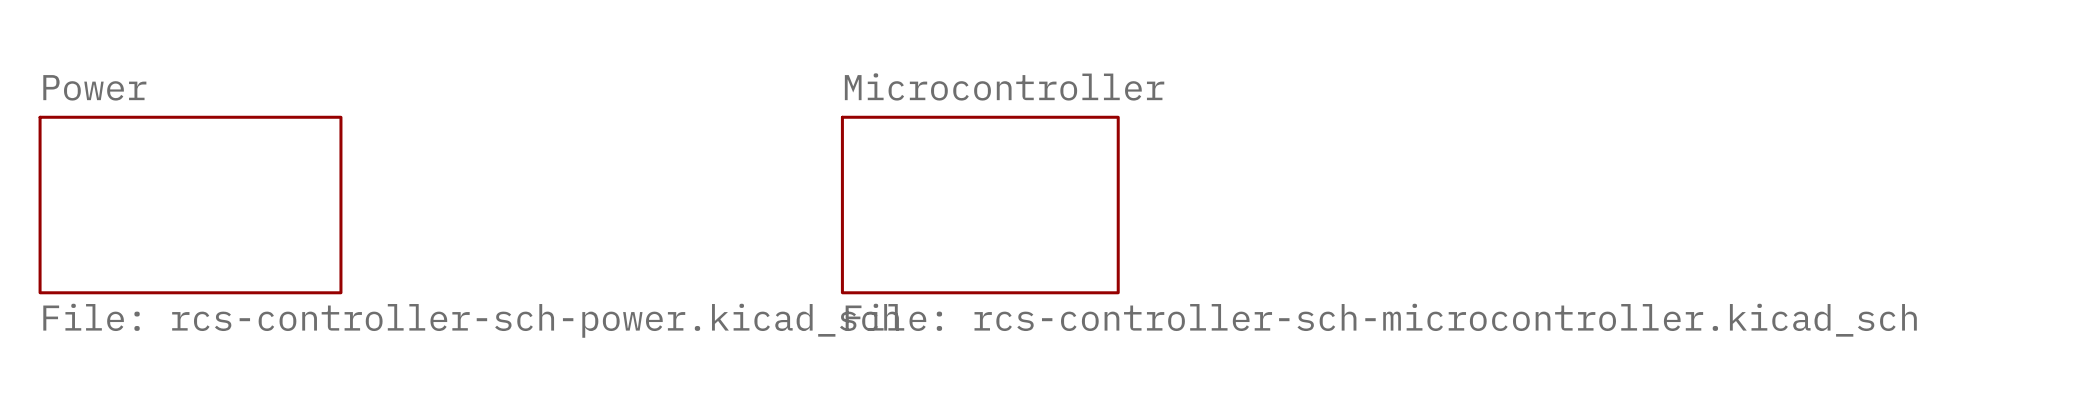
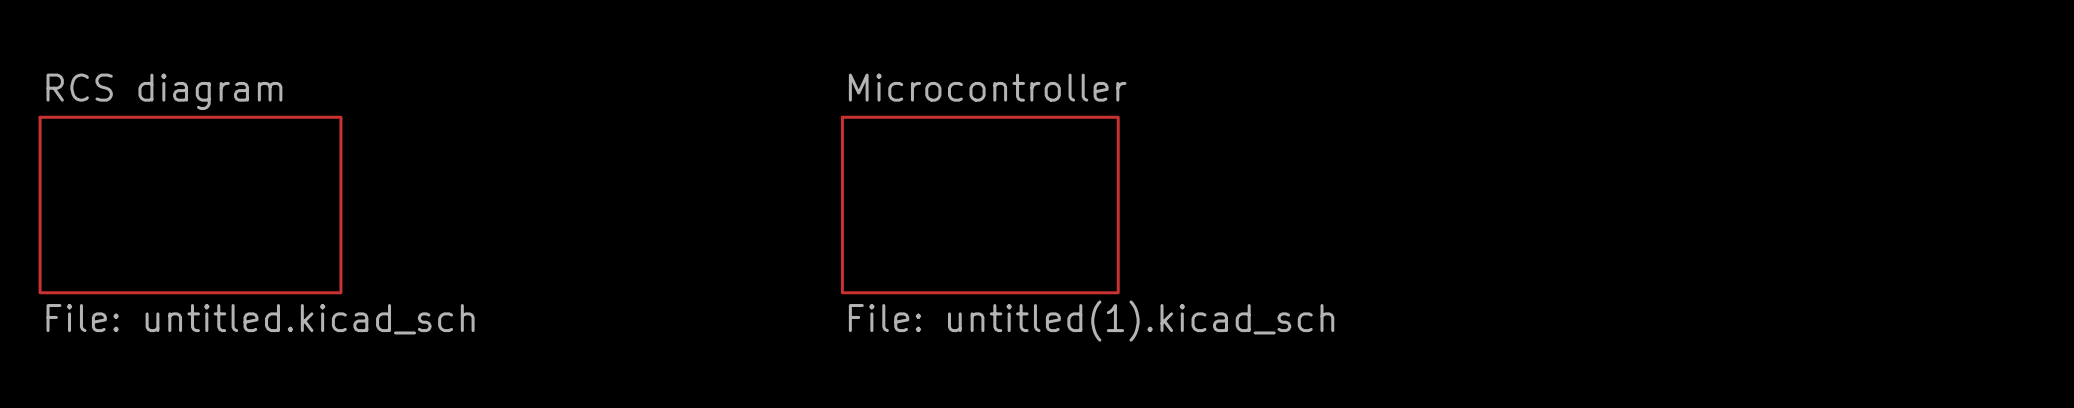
sheet Power name: Power (94, 87) -> RCS diagram (164, 91)
sheet Power value: File: rcs-controller-sch-power.kicad_sch (471, 320) -> File: untitled.kicad_sch (260, 319)
sheet Microcontroller value: File: rcs-controller-sch-microcontroller.kicad_sch (1381, 320) -> File: untitled(1).kicad_sch (1091, 321)

